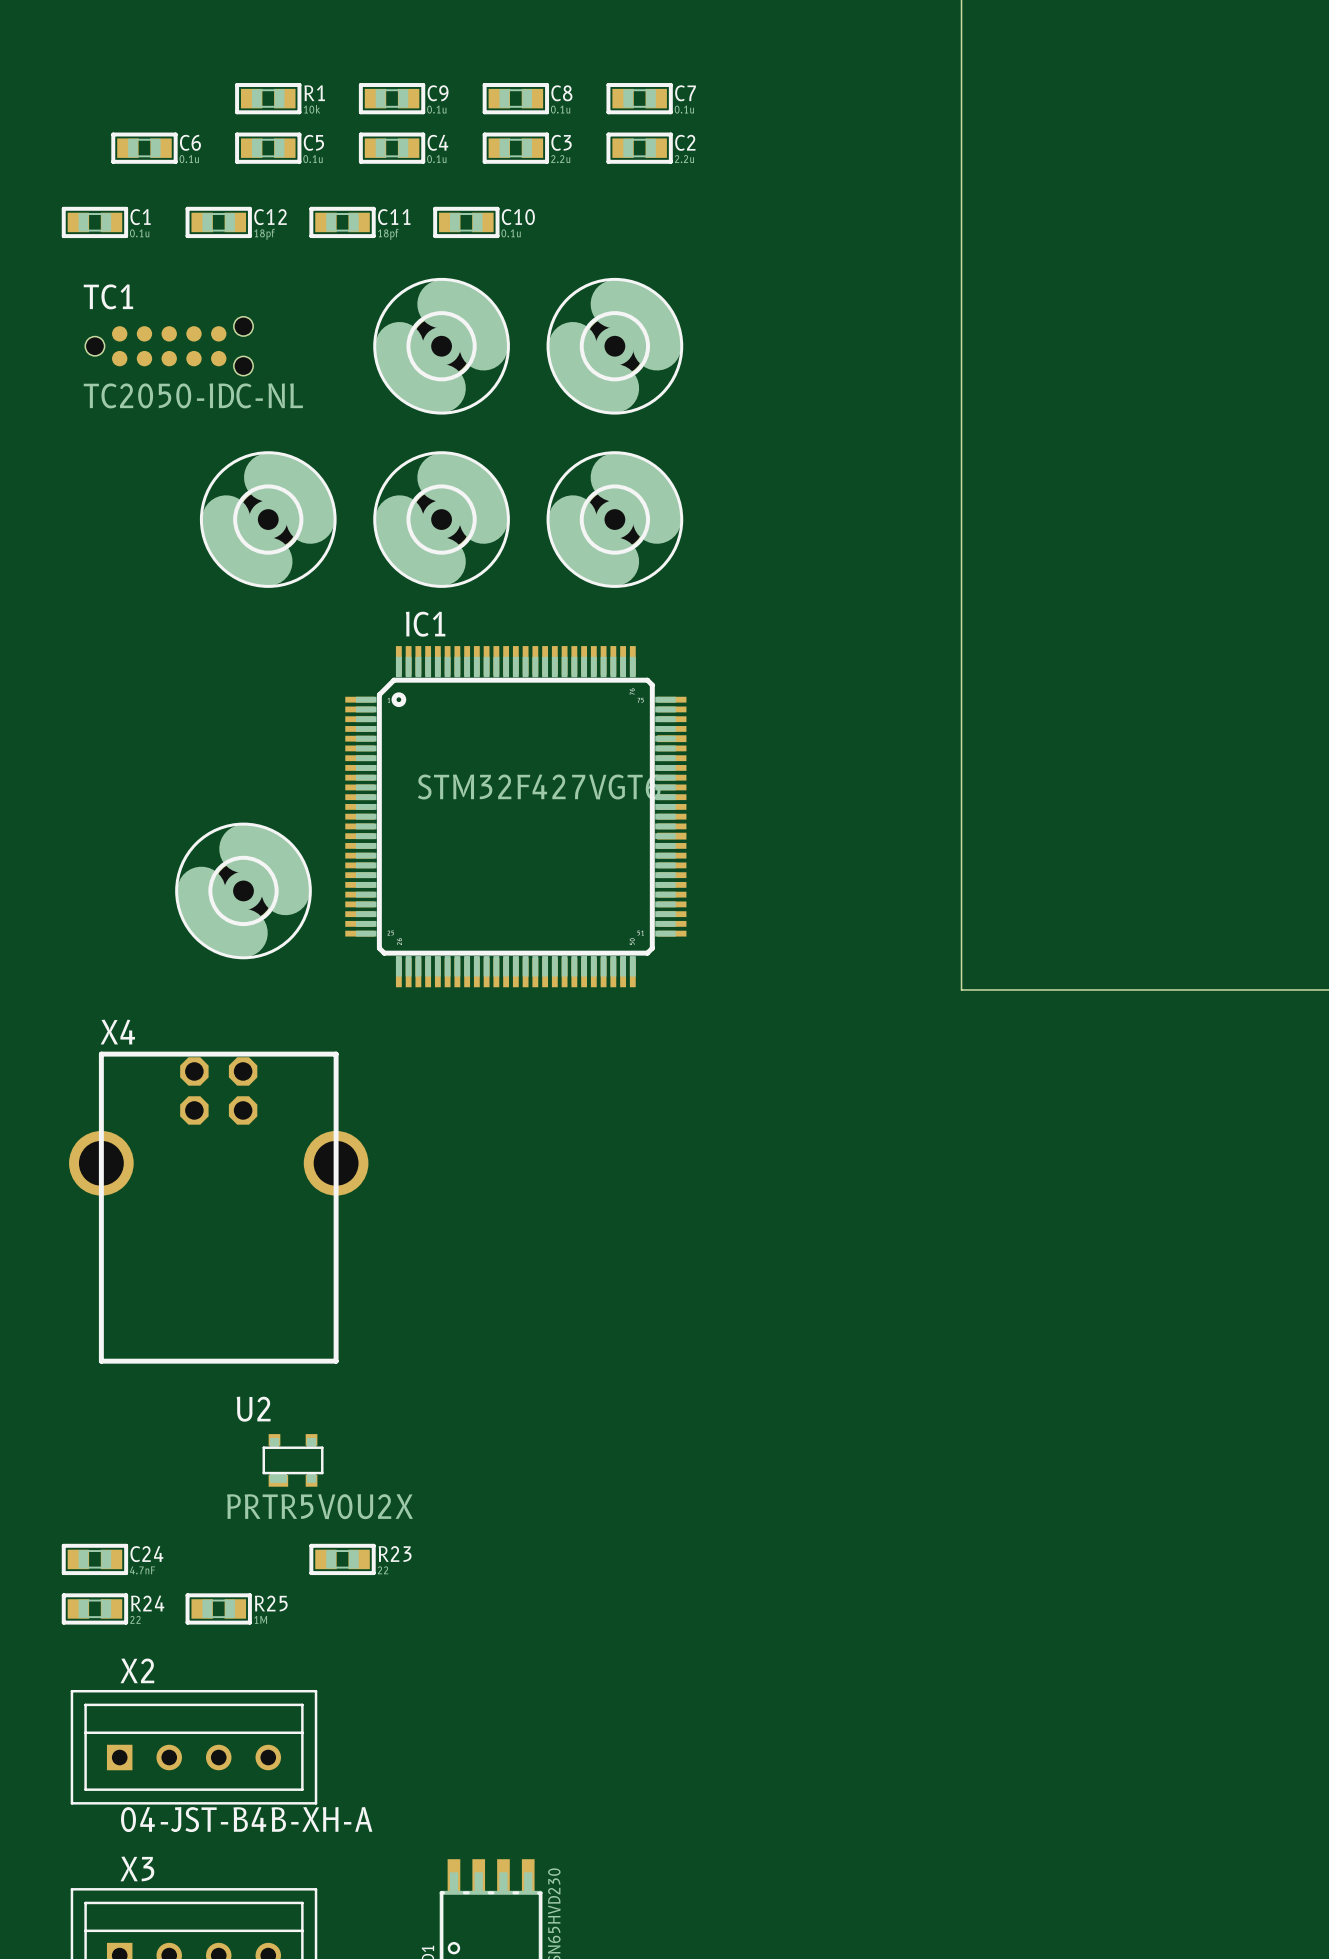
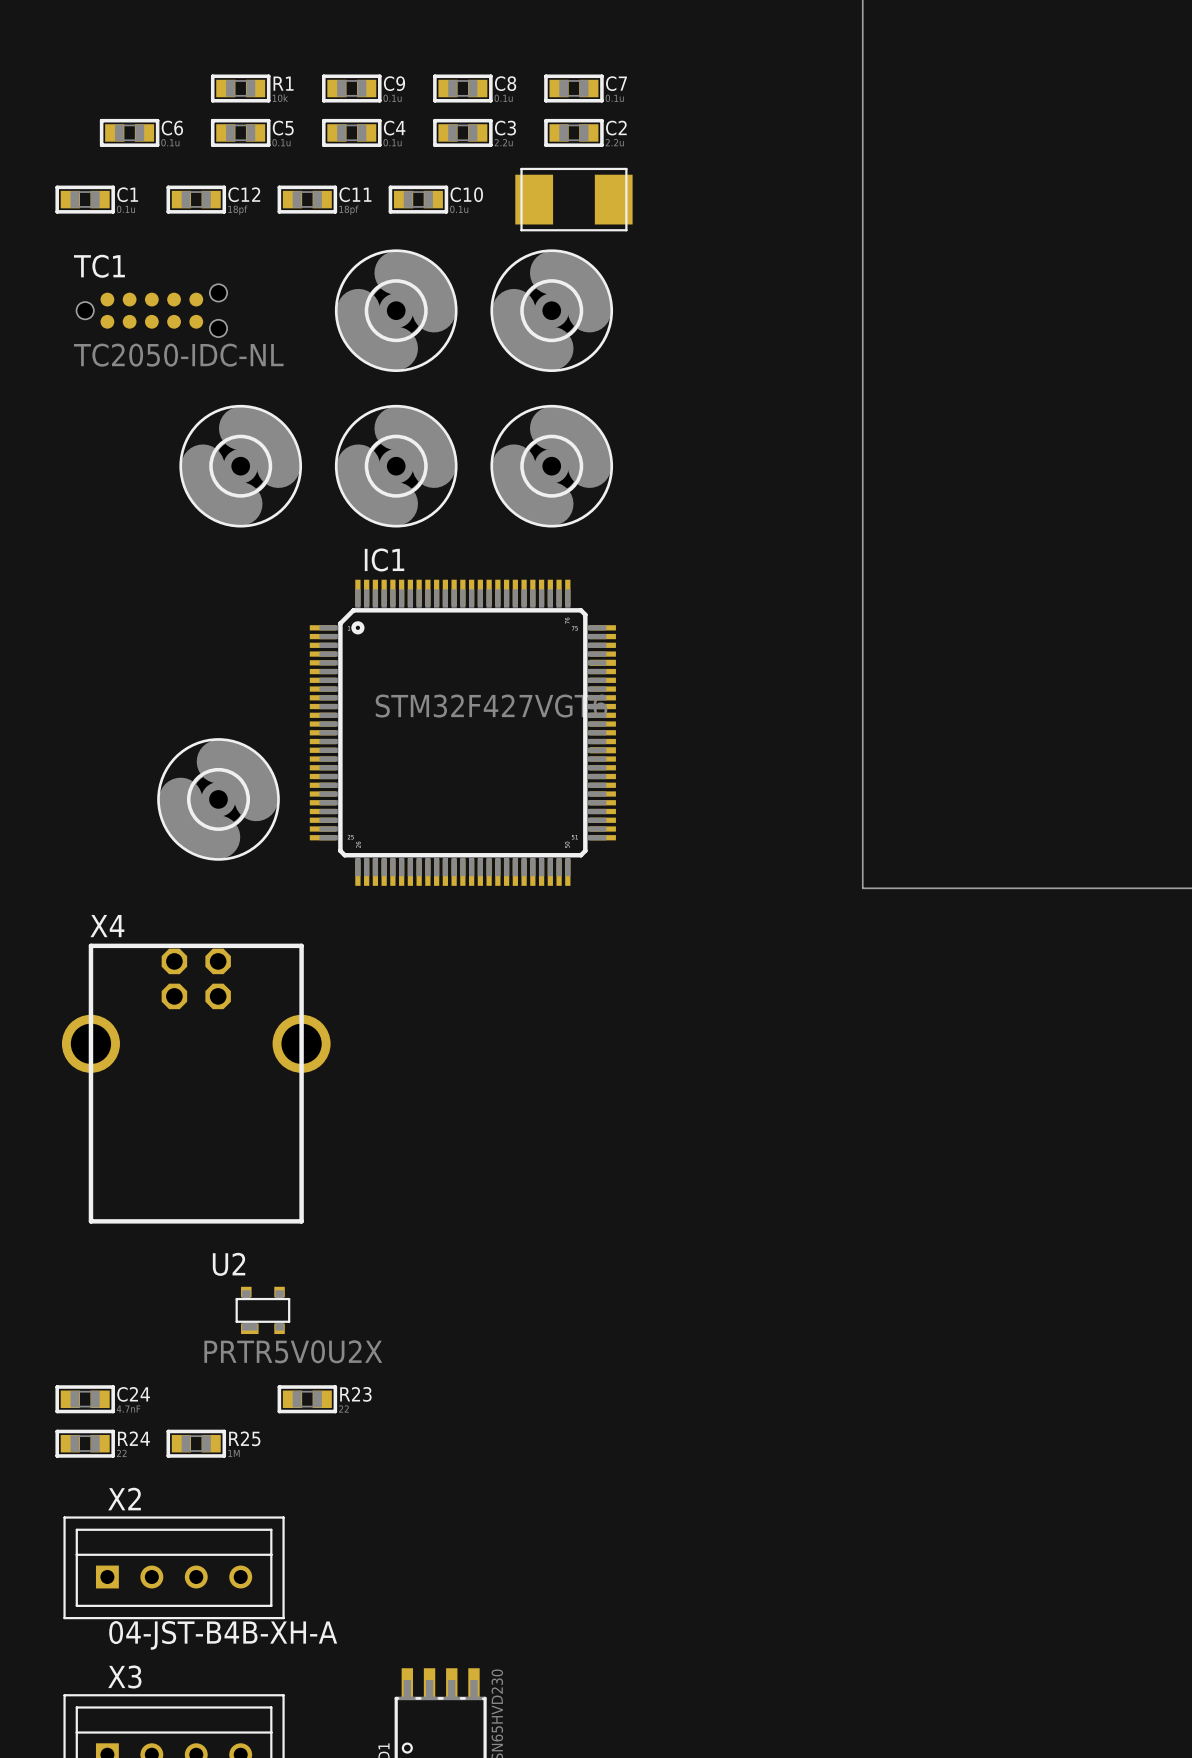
part: none -> (573, 199)

